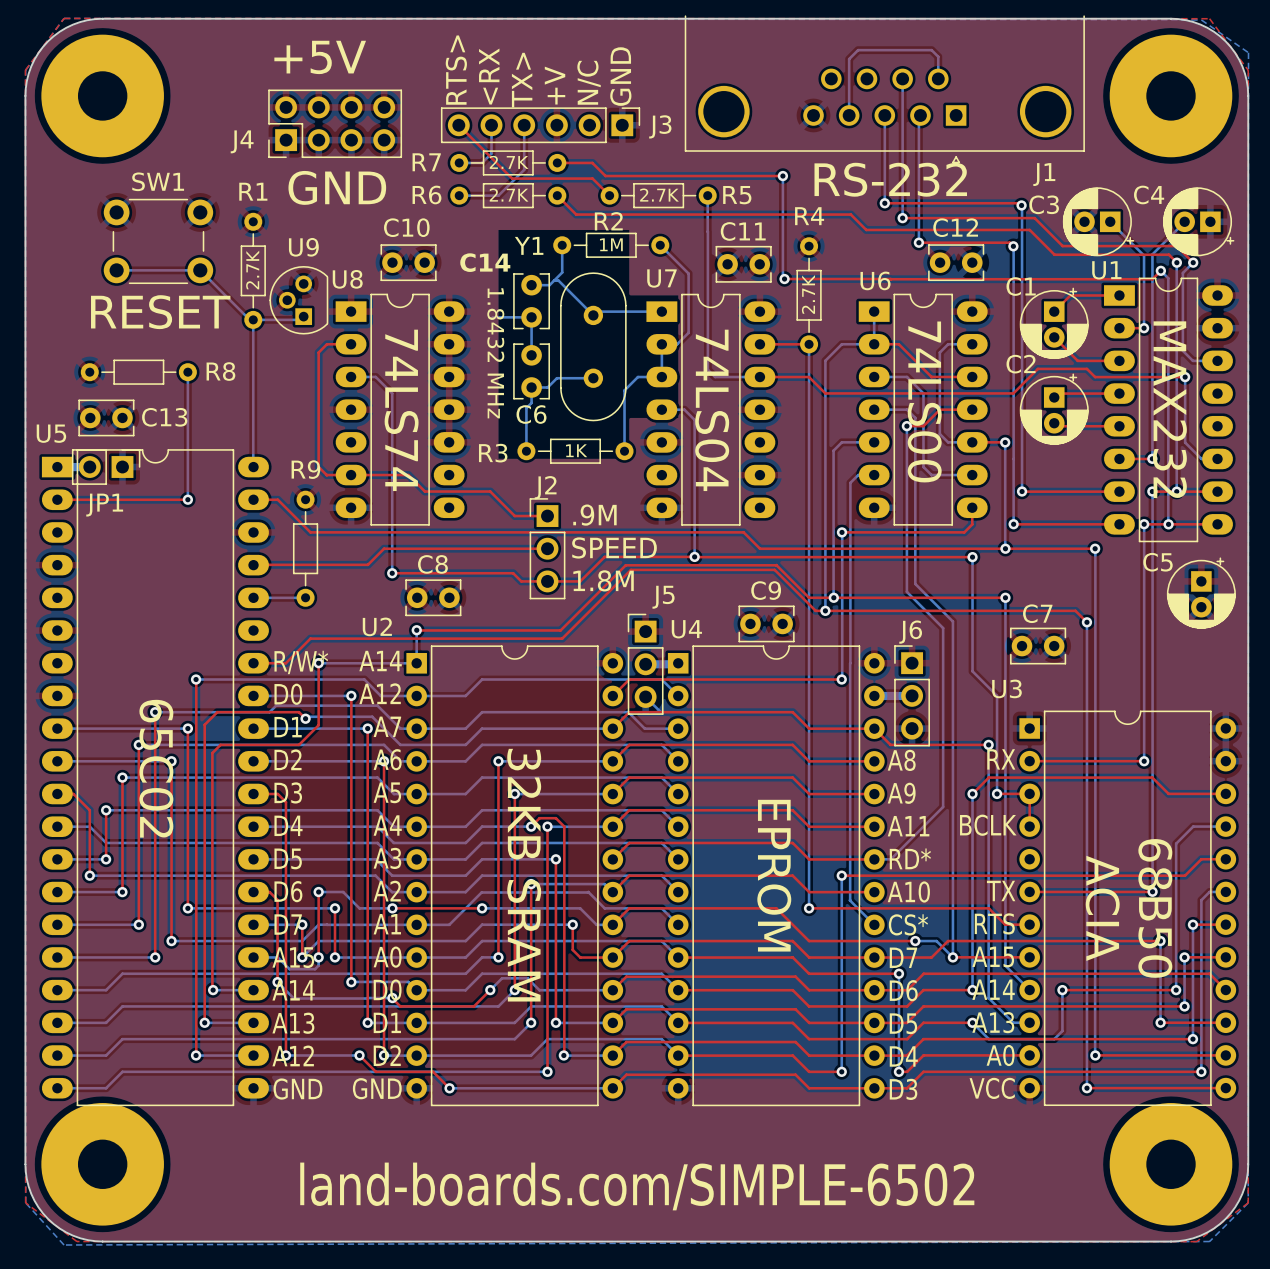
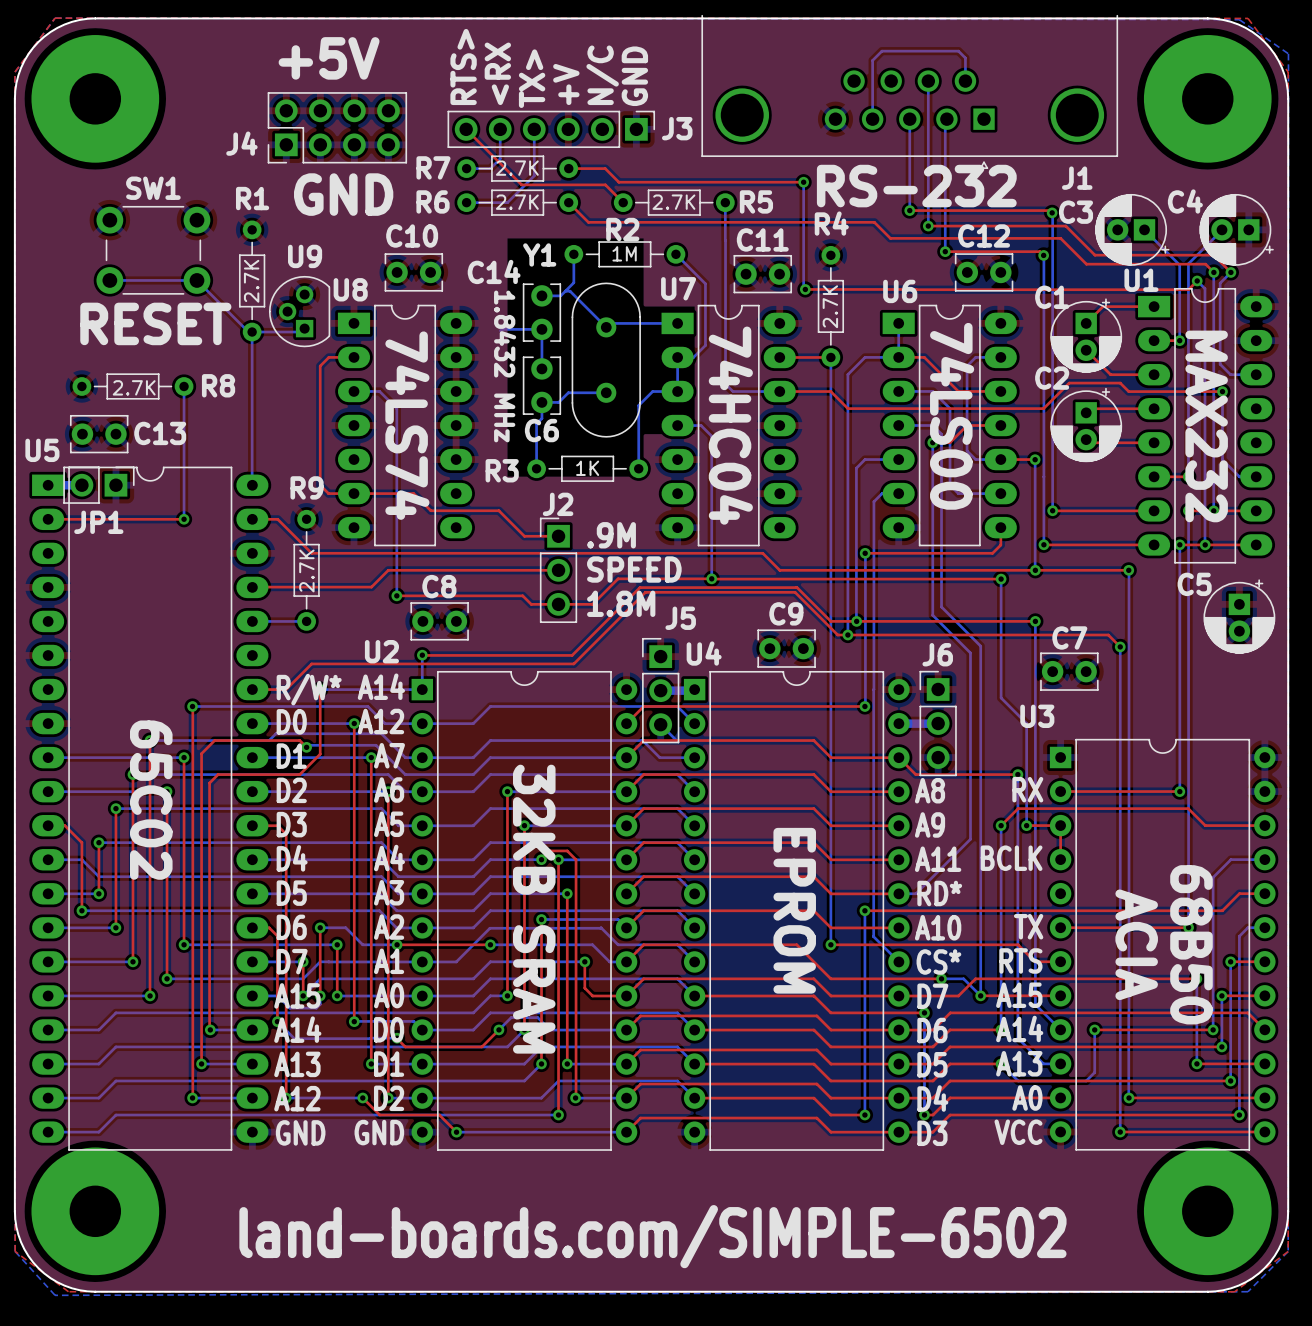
R8 value: none -> 2.7K (134, 387)
text: 74LS04 (712, 410) -> 74HC04 (730, 425)
R9 value: none -> 2.7K (306, 570)

